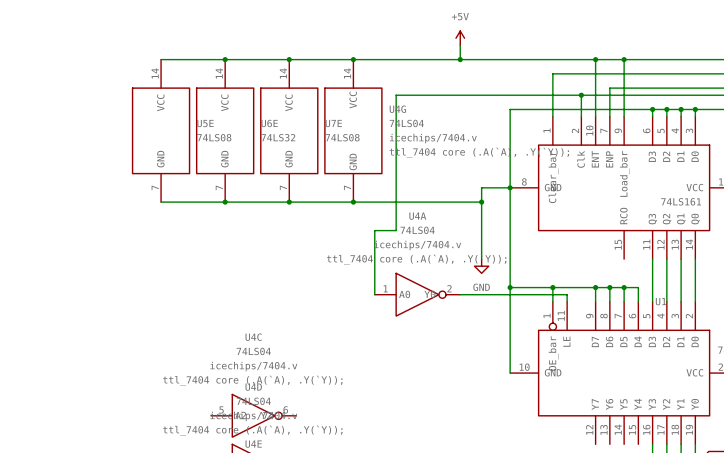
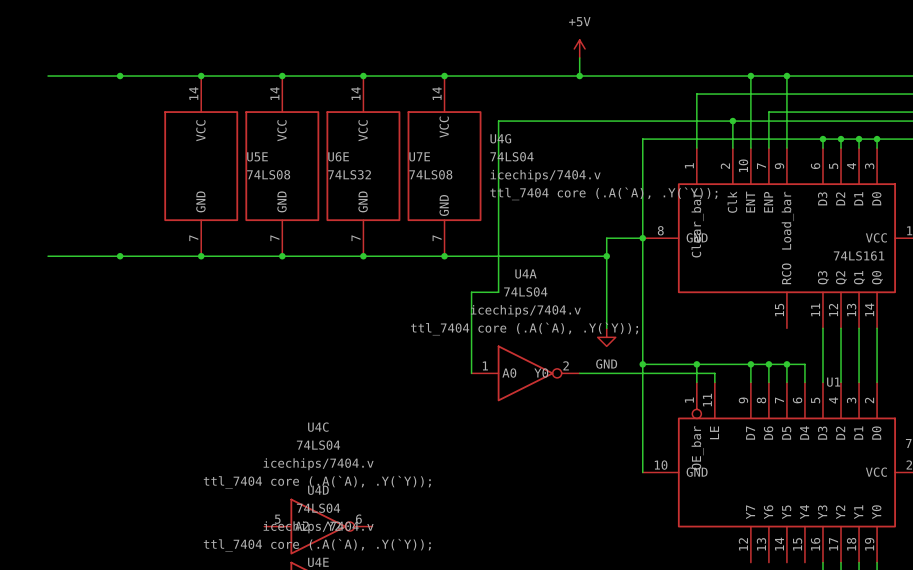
wire: none -> (48, 76) (201, 76)
junction: none -> (120, 76)
junction: none -> (201, 76)
wire: none -> (48, 256) (201, 256)
junction: none -> (120, 256)
junction: none -> (201, 256)

